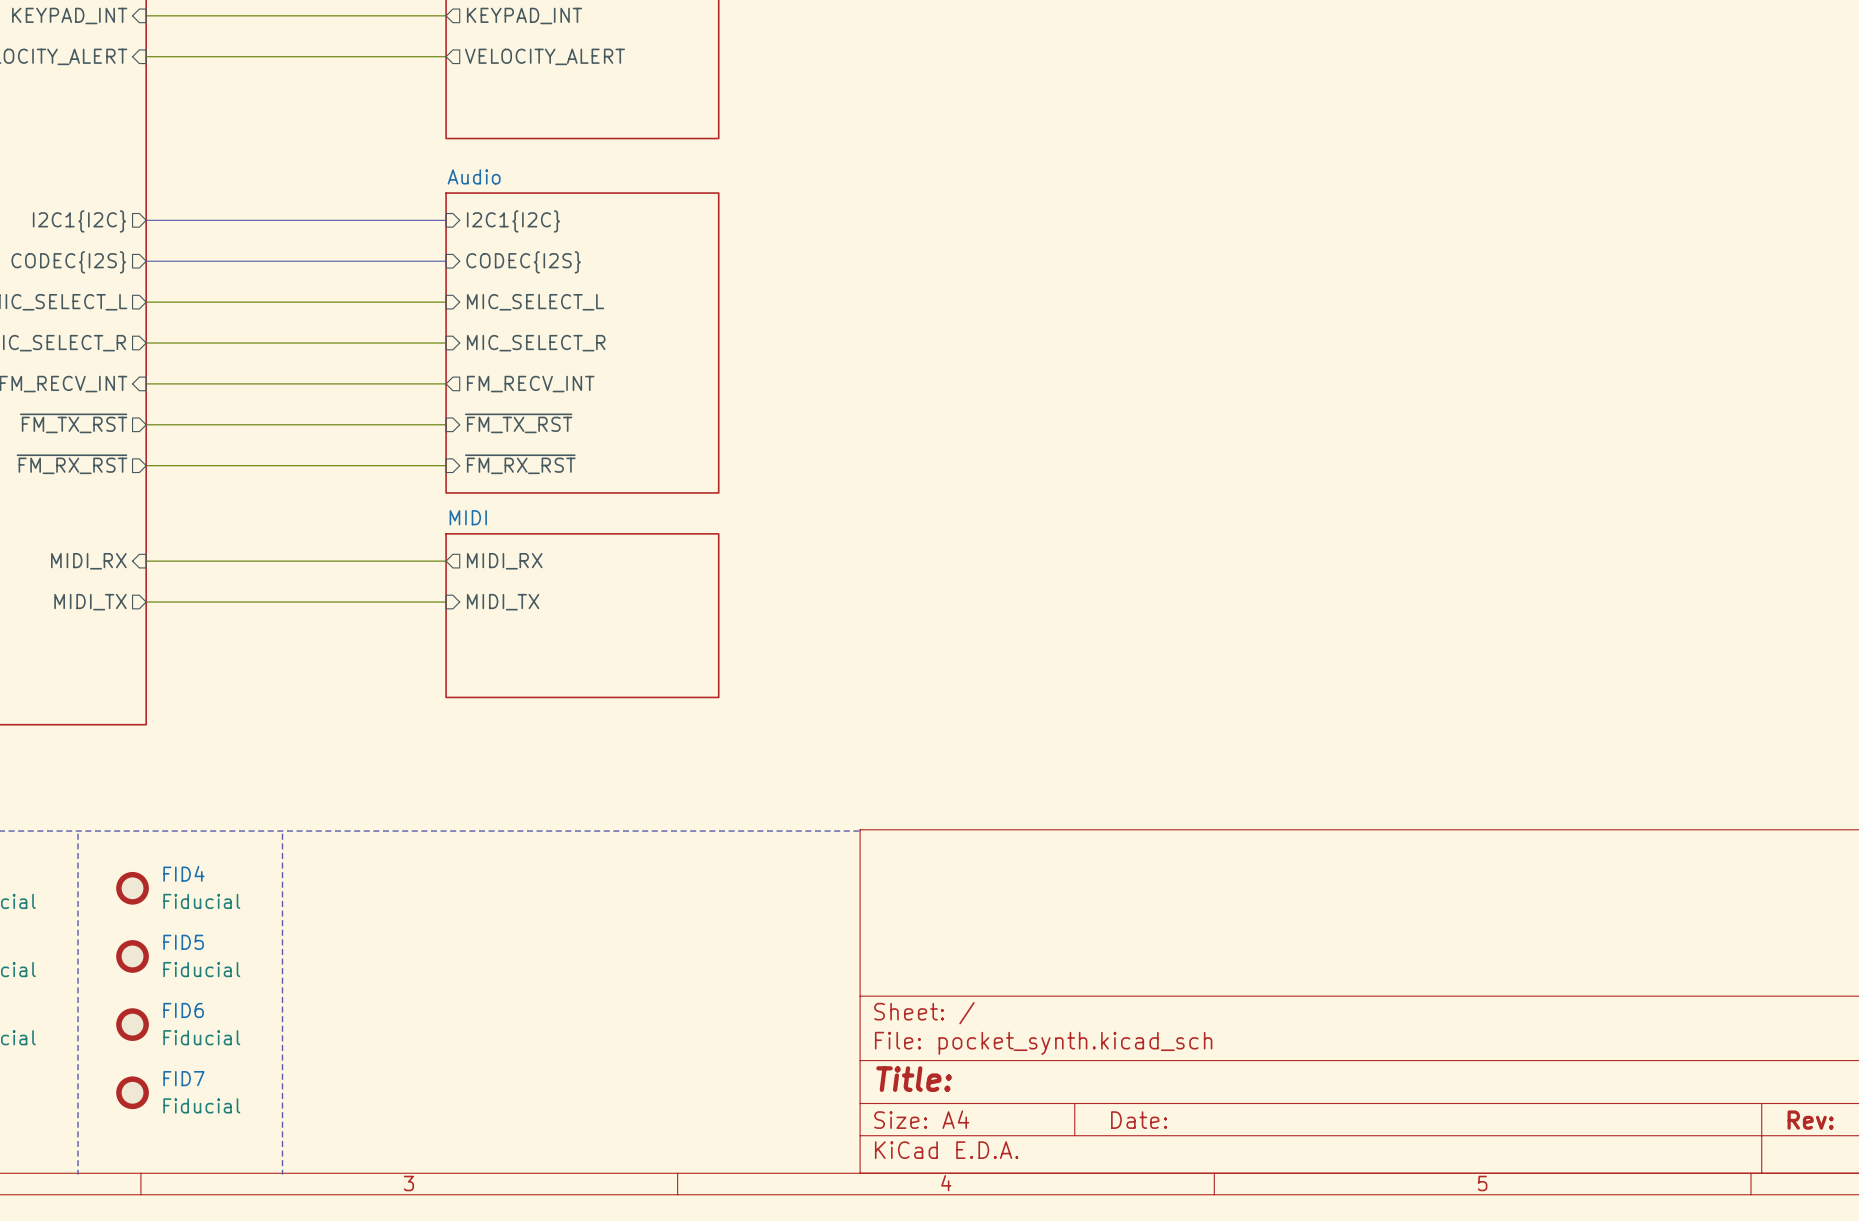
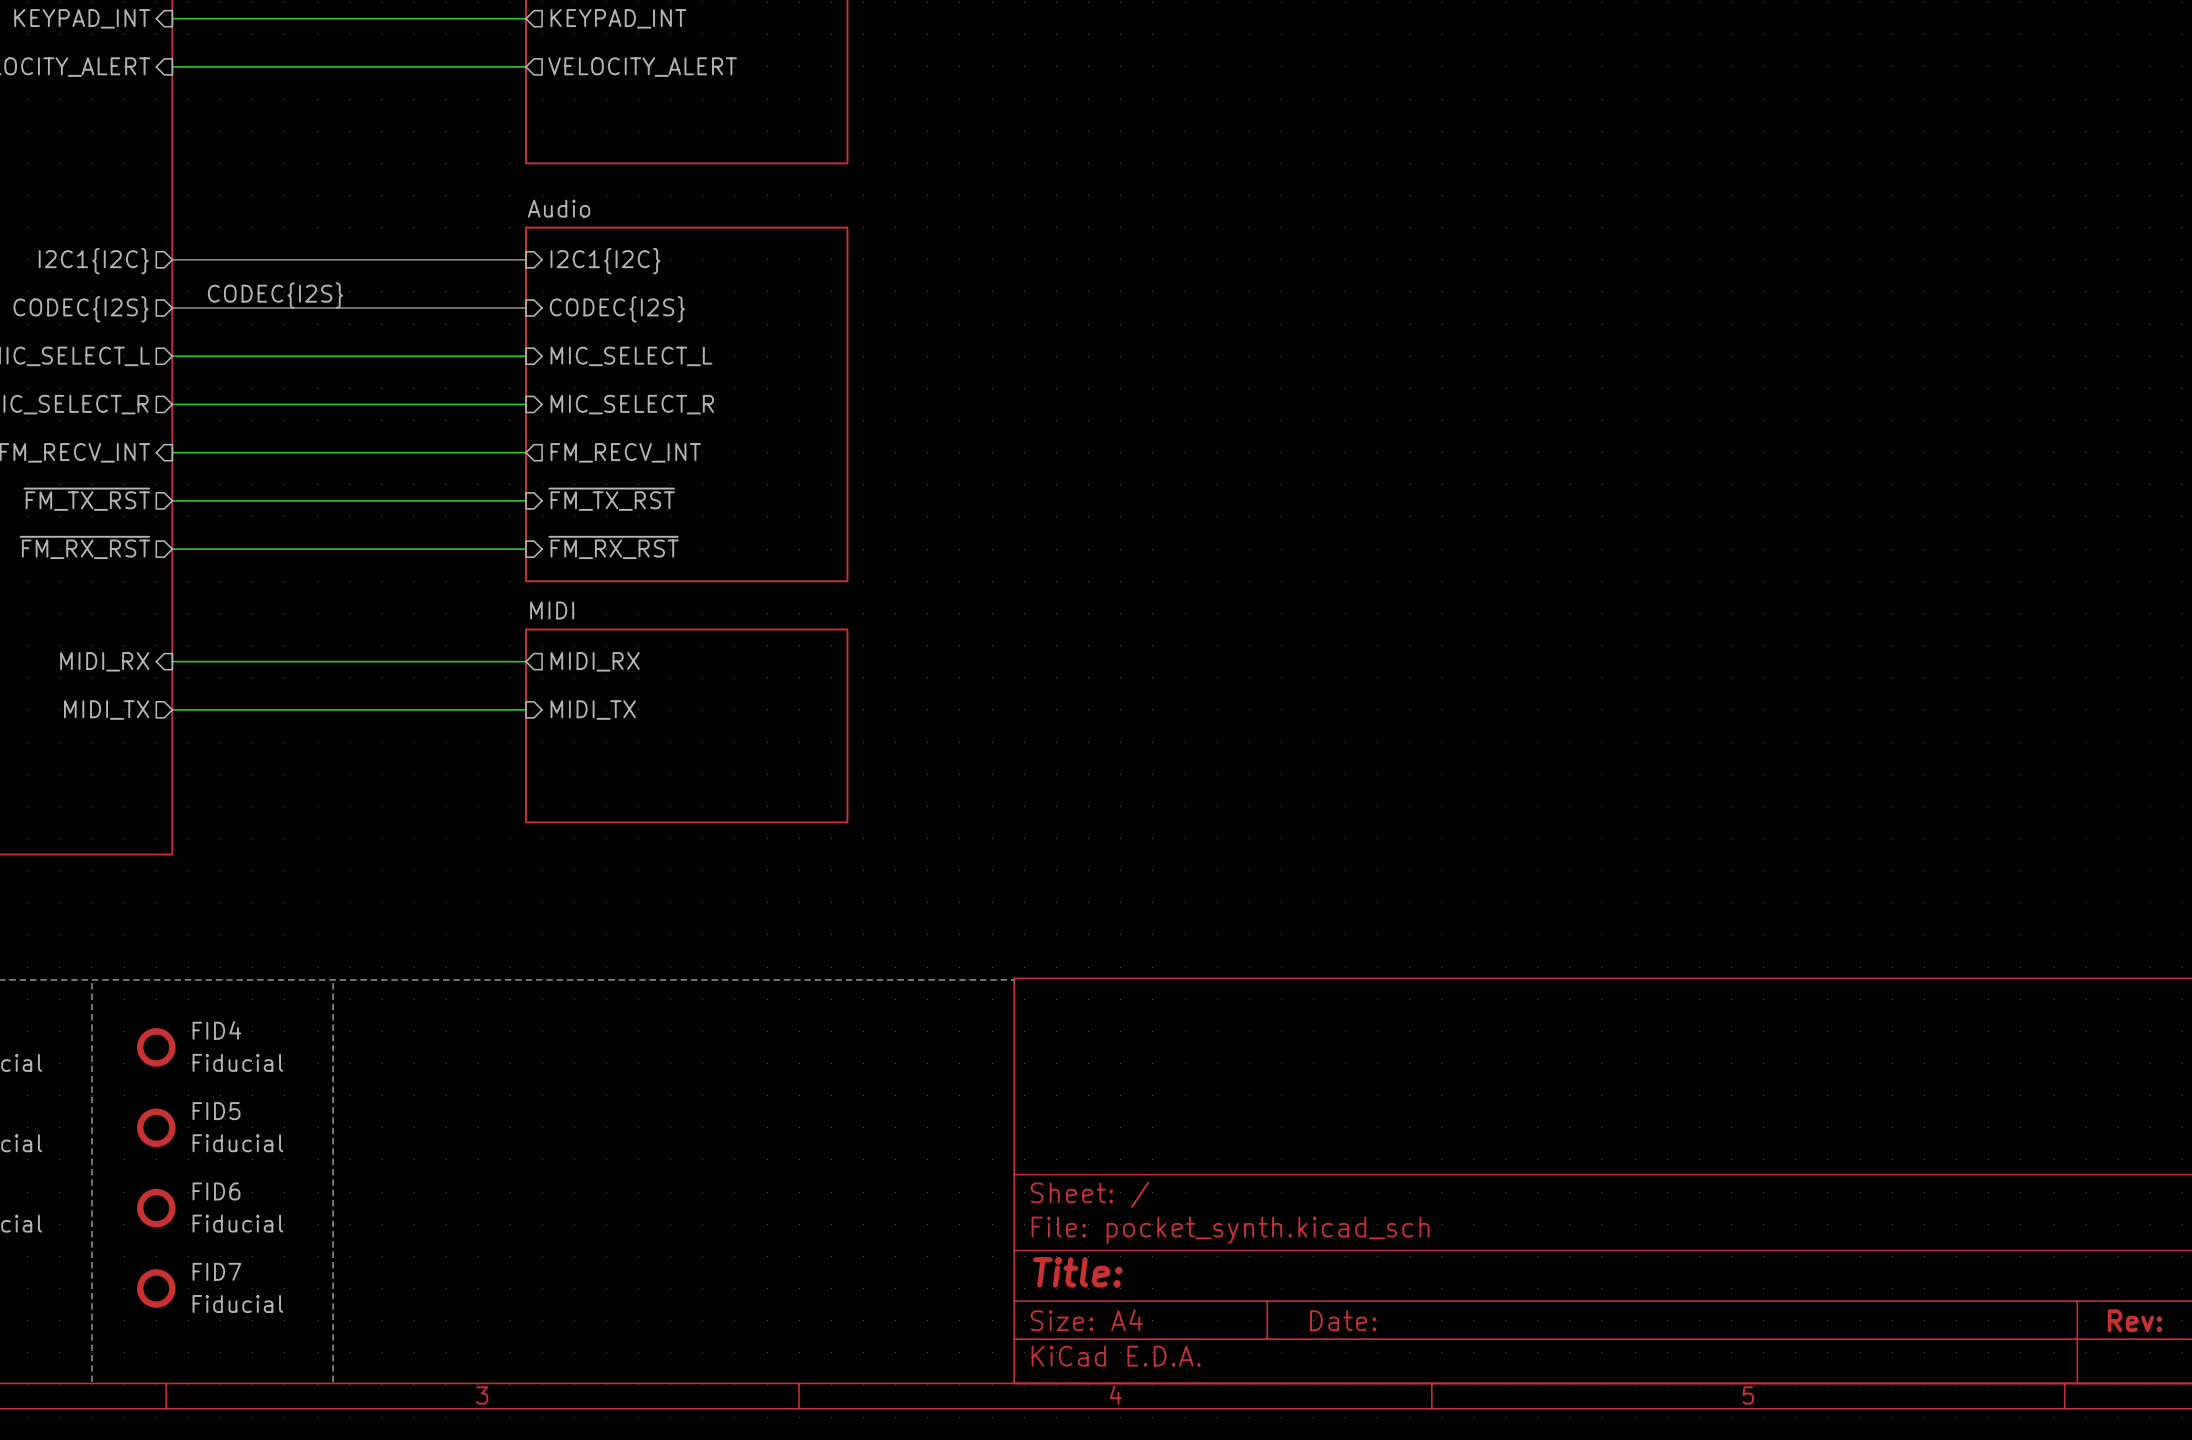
label: none -> CODEC{I2S} (275, 295)

